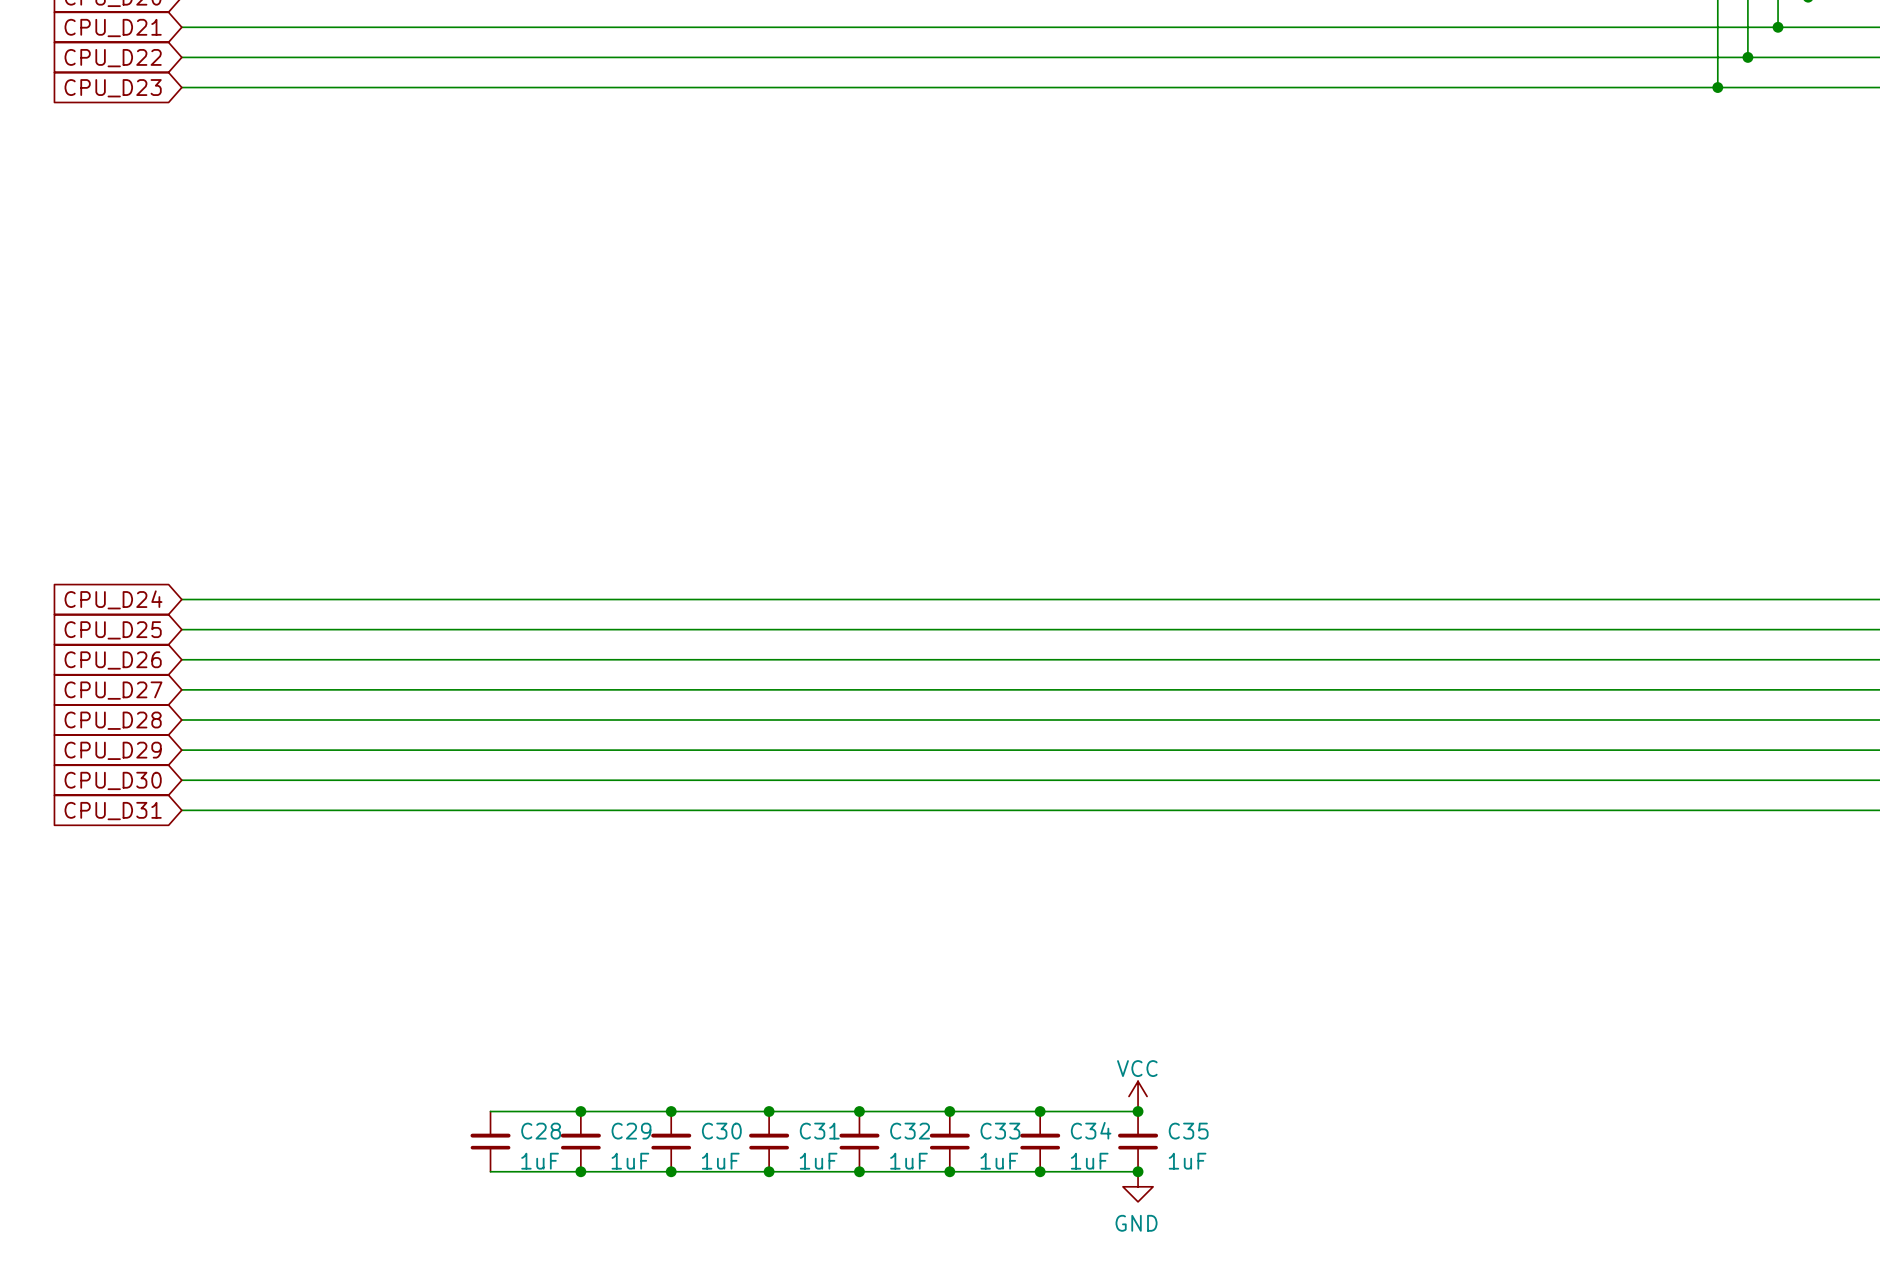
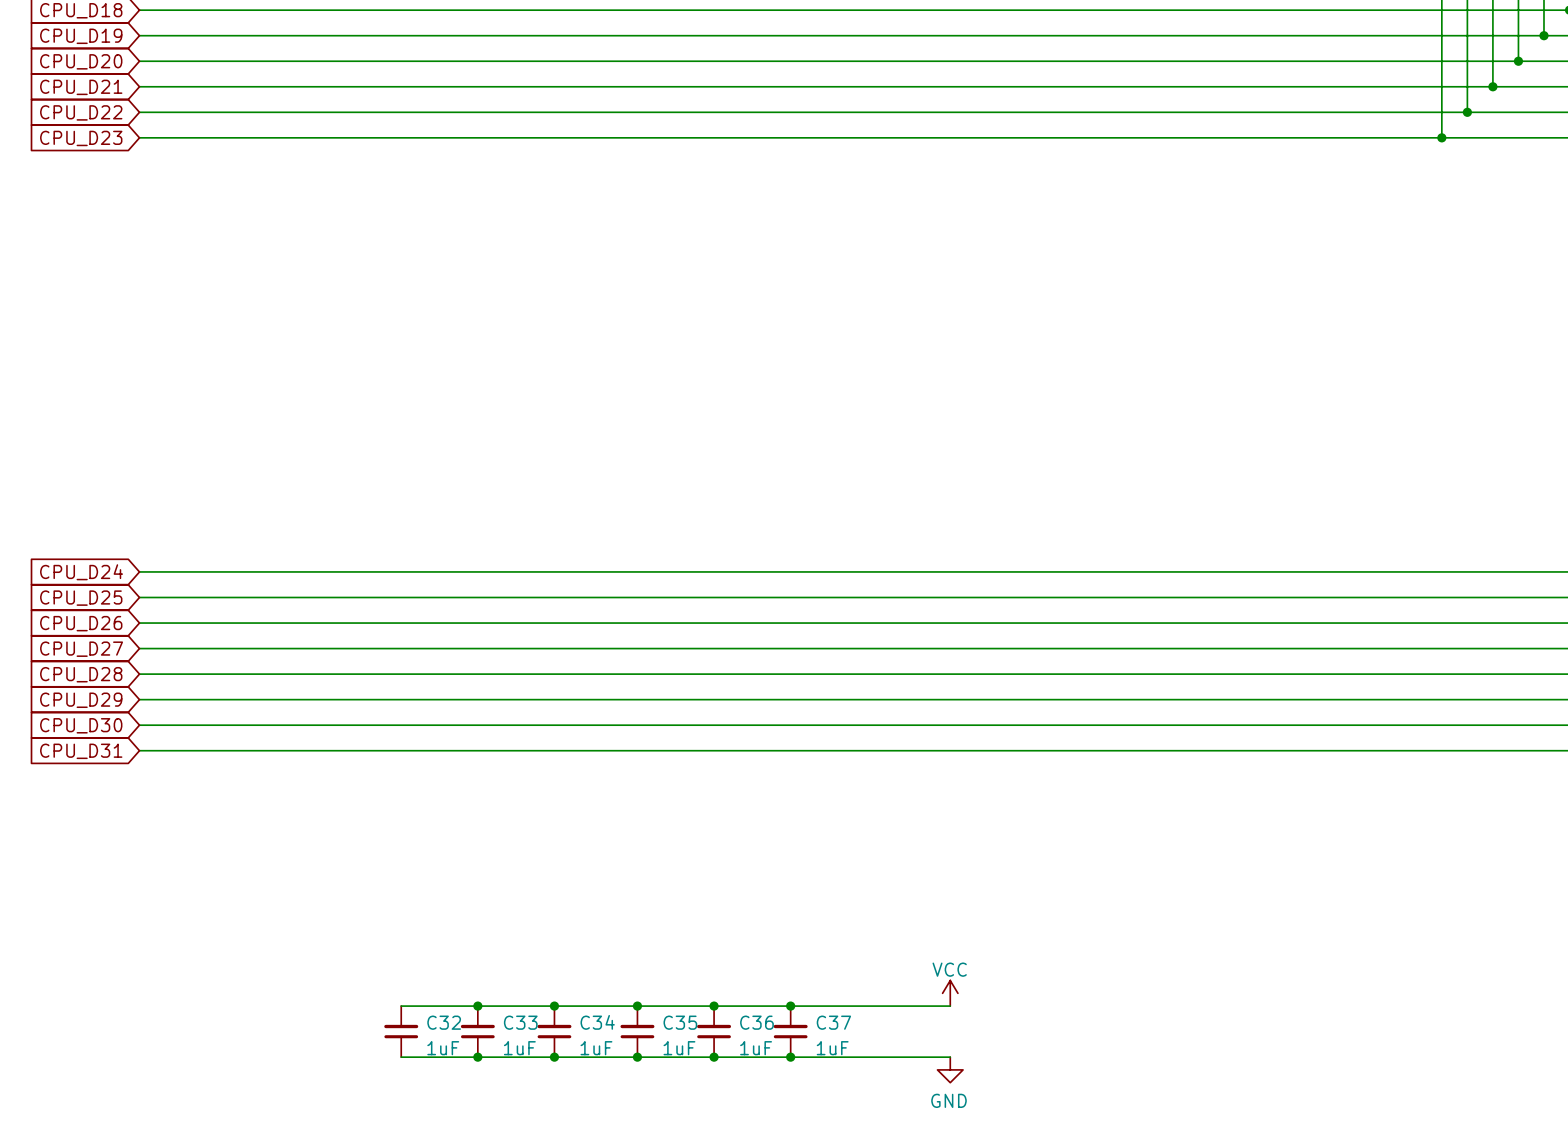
junction: (1040, 1111) -> none
junction: (1138, 1111) -> none
C28 name: C28 (541, 1131) -> C32 (444, 1022)
C29 name: C29 (631, 1131) -> C33 (520, 1022)
C30 name: C30 (721, 1131) -> C34 (597, 1022)
C31 name: C31 (819, 1131) -> C35 (680, 1022)
C32 name: C32 (910, 1131) -> C36 (756, 1022)
C33 name: C33 (1000, 1131) -> C37 (833, 1022)
C34: 1uF (1040, 1141) -> none
C35: 1uF (1138, 1141) -> none
junction: (1040, 1171) -> none
junction: (1138, 1171) -> none

